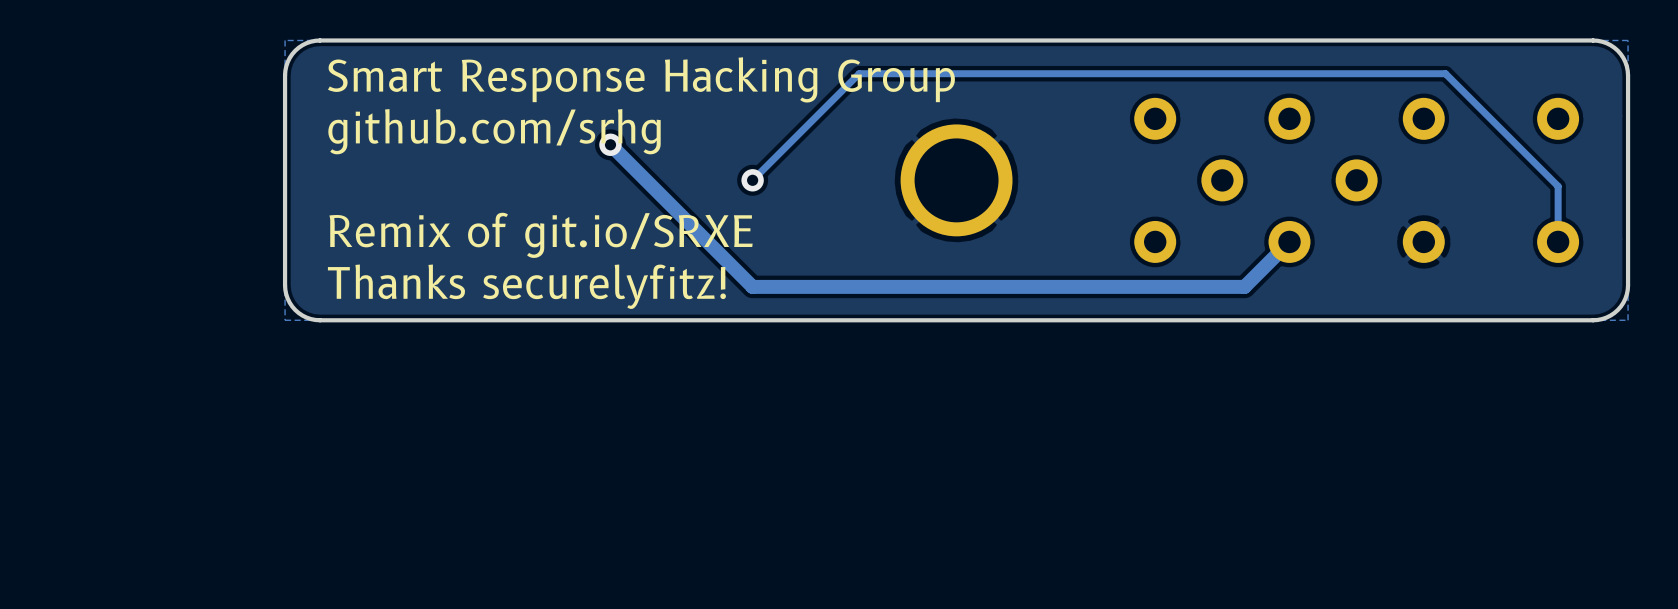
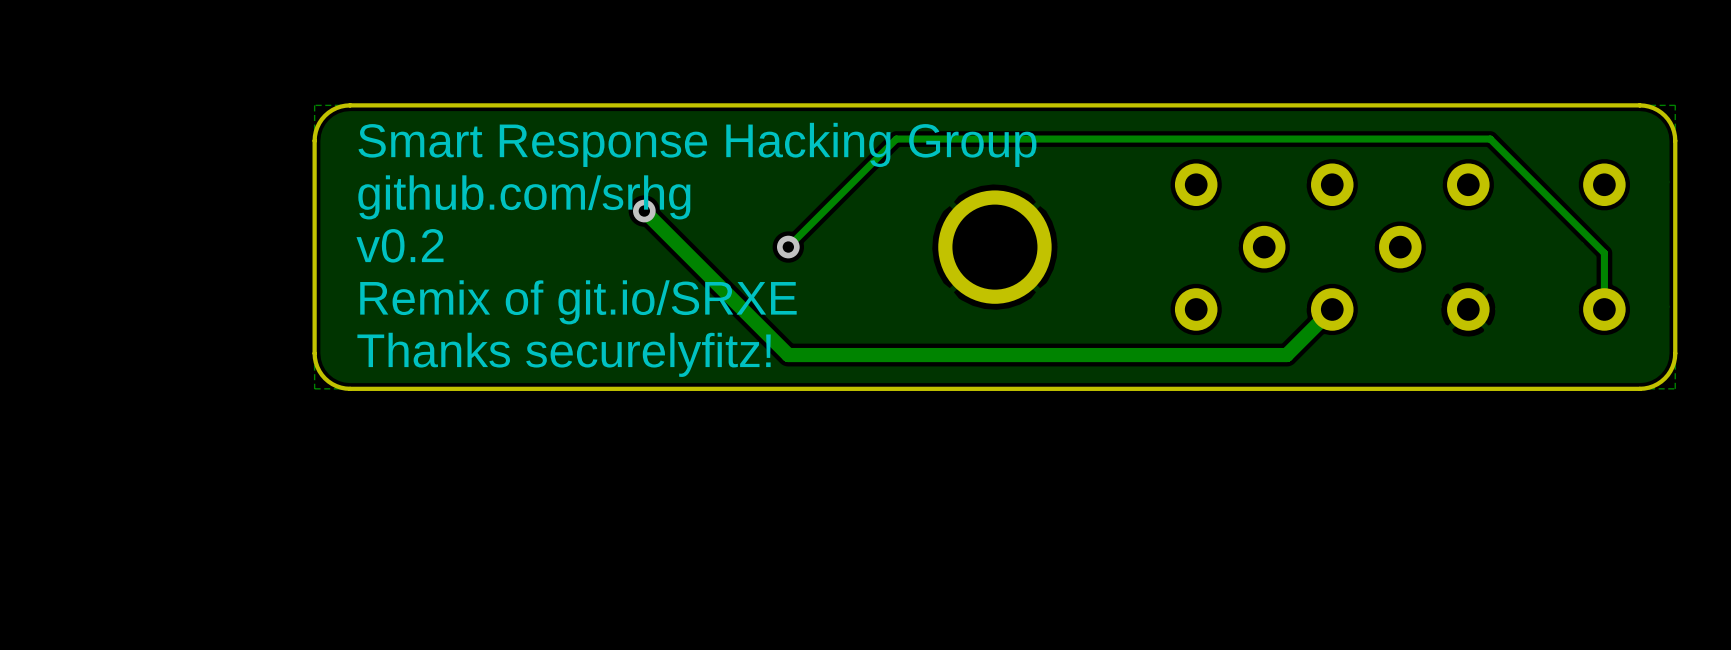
text: none -> v0.2 (400, 245)

